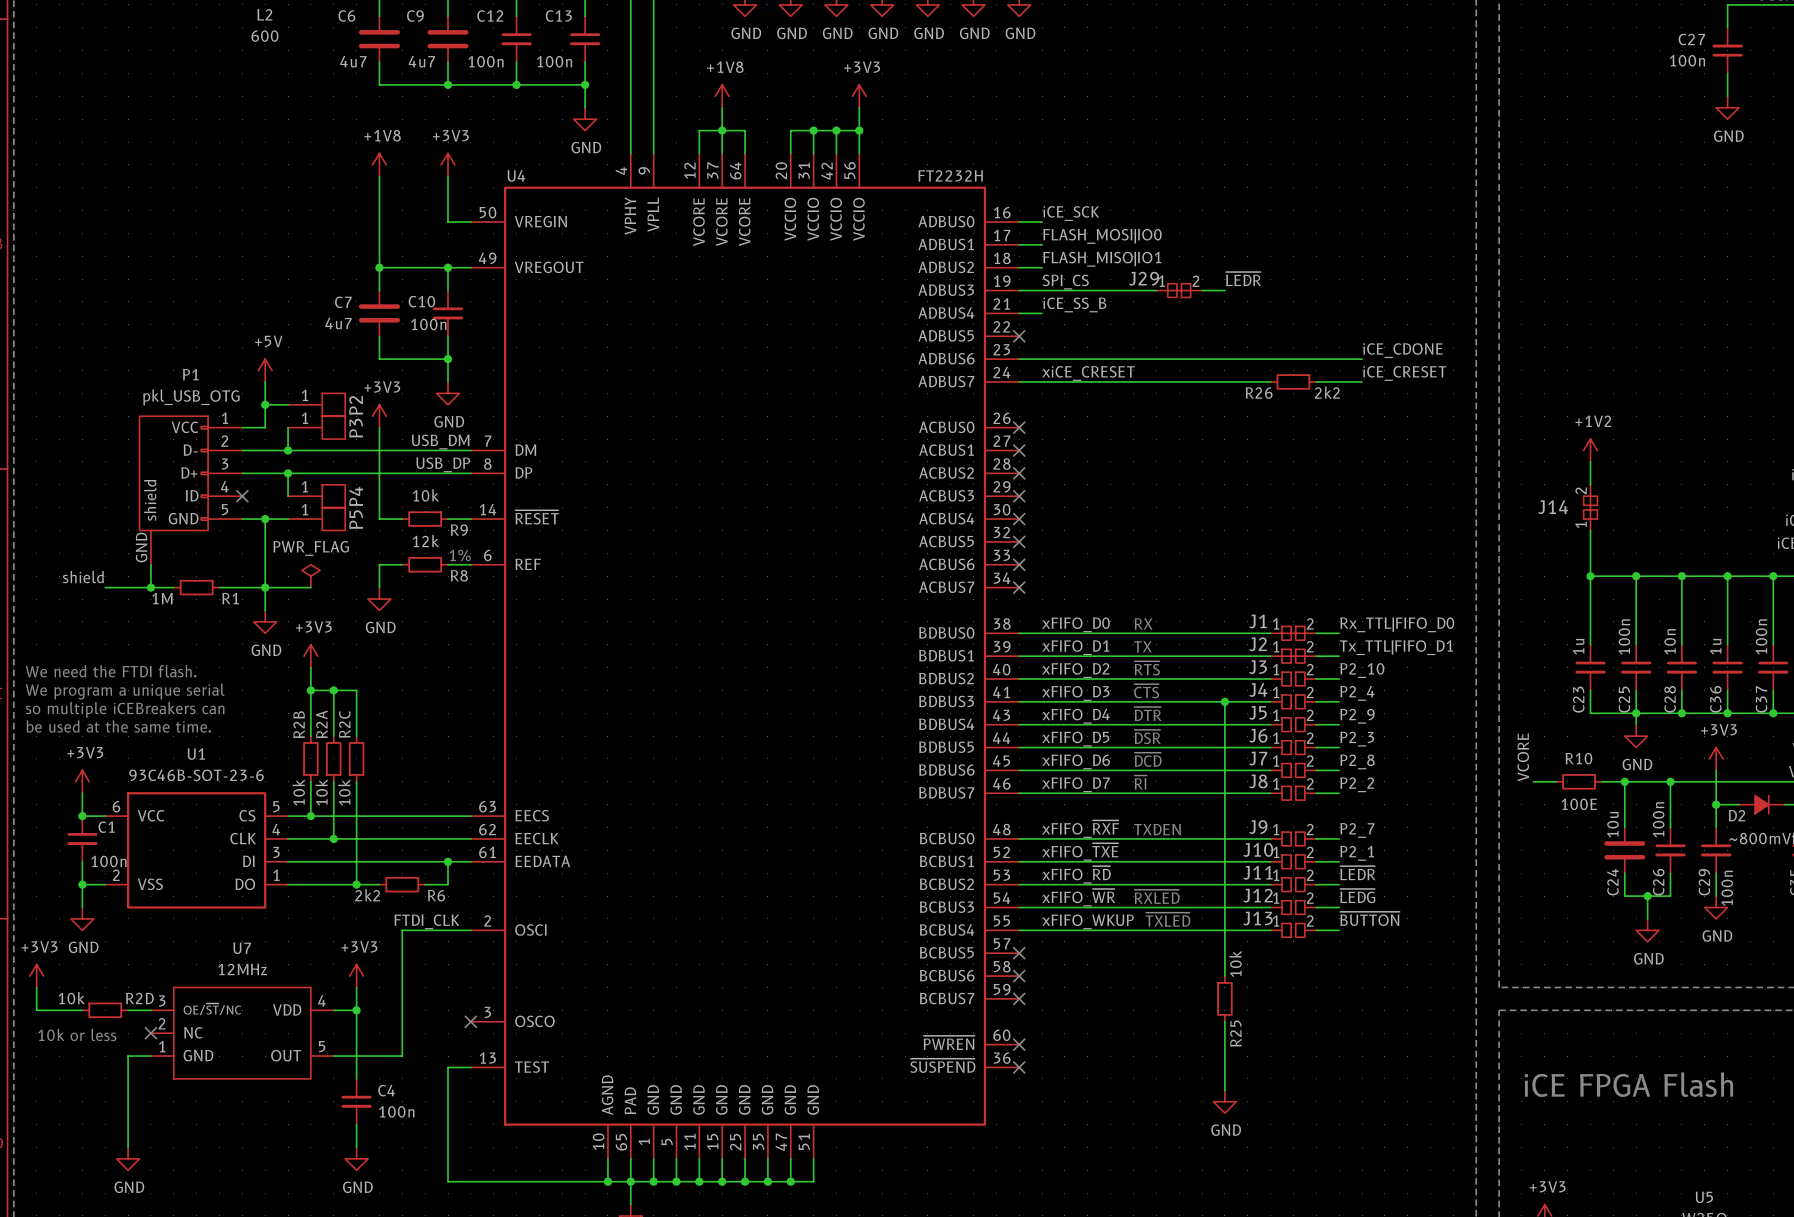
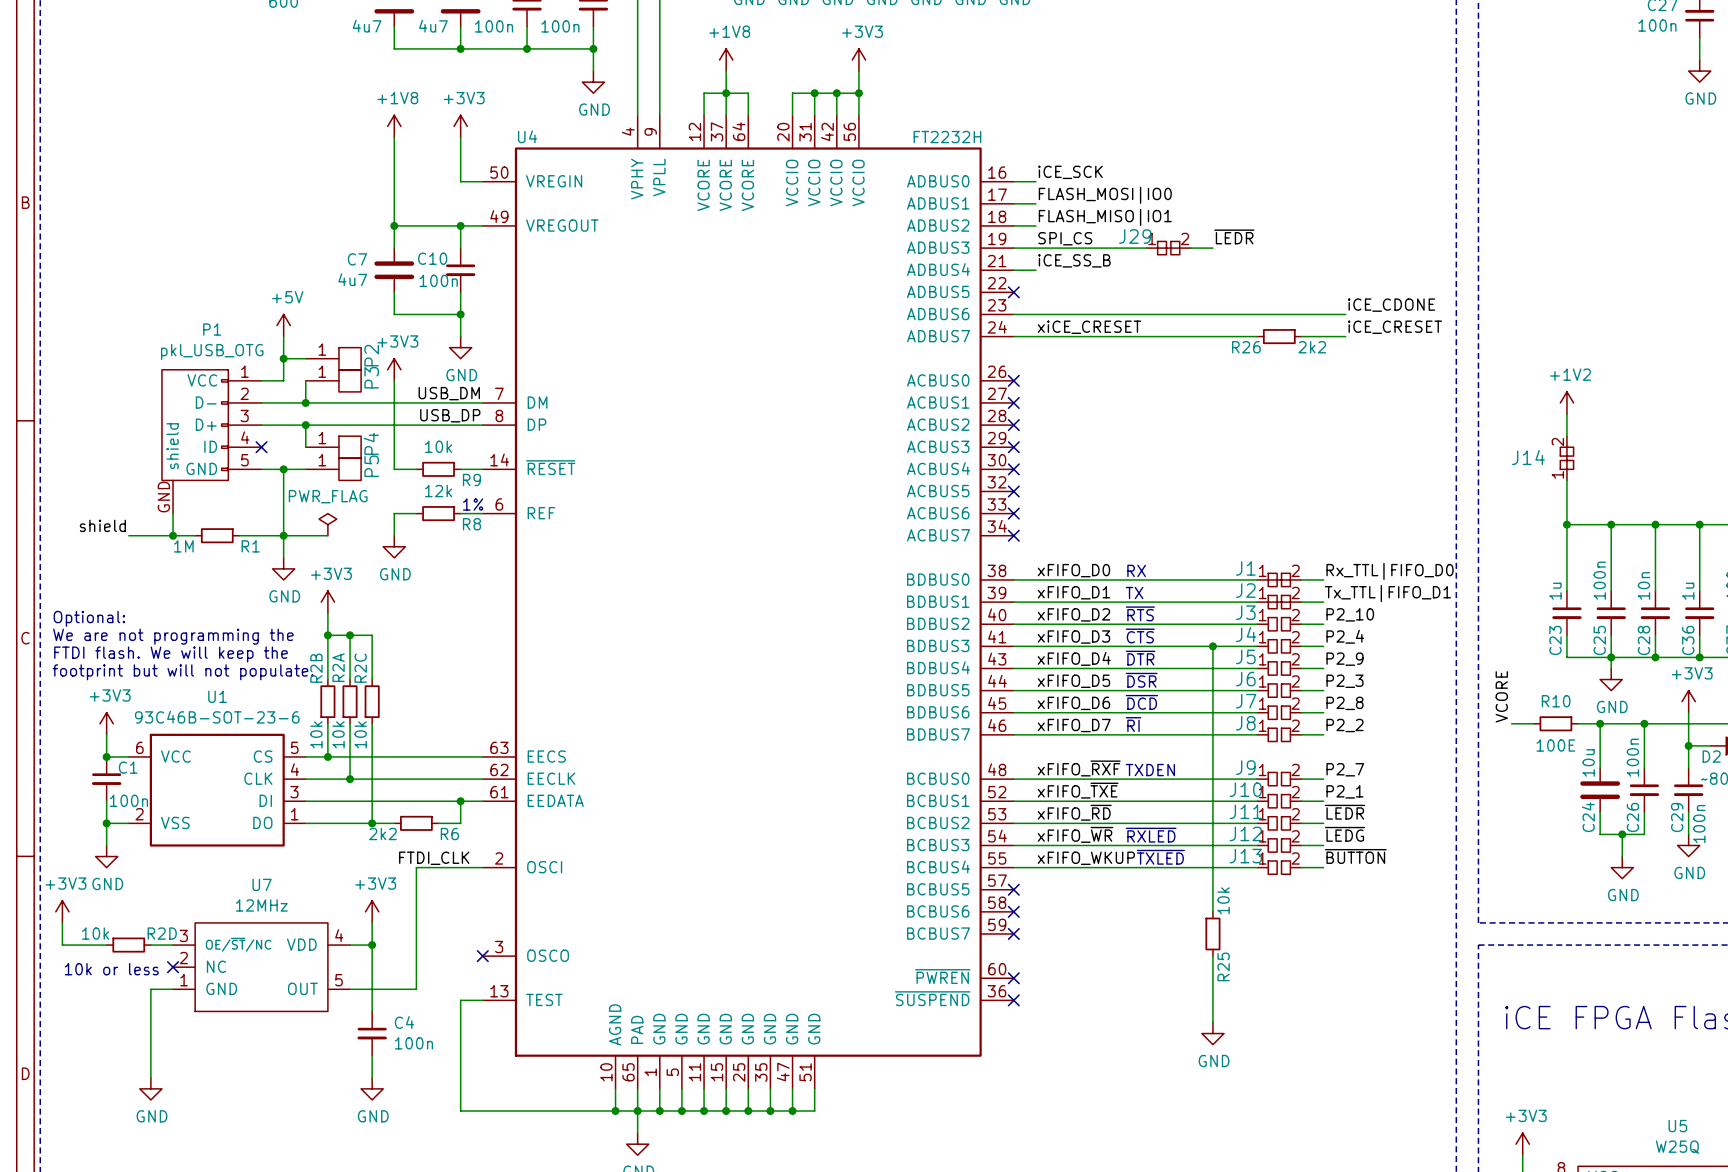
text: We need the FTDI flash. (111, 671) -> Optional: (89, 618)
text: We program a unique serial (125, 691) -> We are not programming the (173, 636)
text: so multiple iCEBreakers can (125, 709) -> FTDI flash. We will keep the (171, 654)
text: be used at the same time. (118, 726) -> footprint but will not populate. (183, 672)

